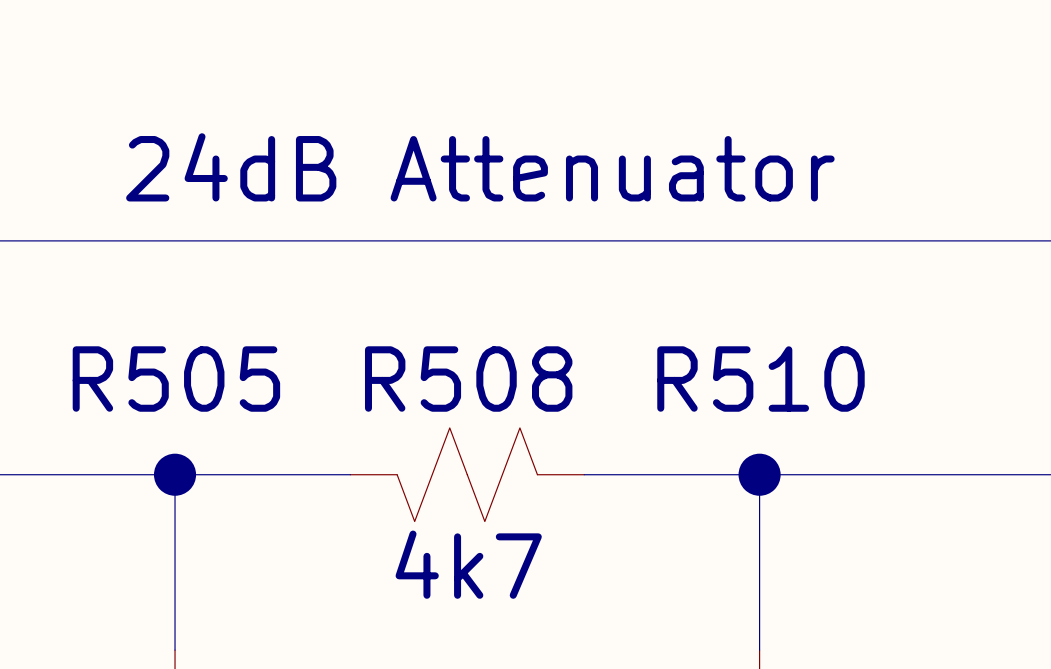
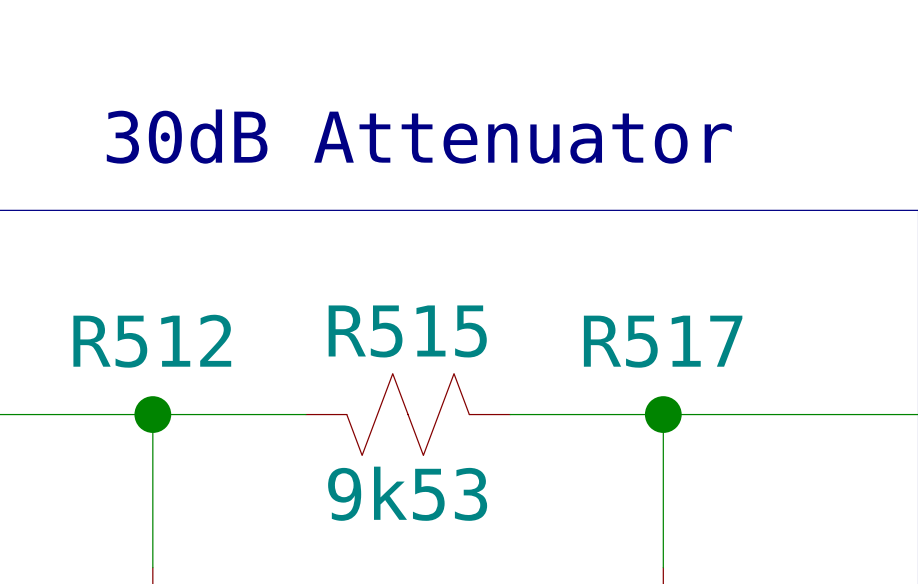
text: 24dB Attenuator (480, 167) -> 30dB Attenuator (419, 136)
R505 name: R505 (176, 379) -> R512 (152, 341)
R508 name: R508 (468, 379) -> R515 (407, 331)
R510 name: R510 (760, 379) -> R517 (663, 341)
R508 value: 4k7 (468, 564) -> 9k53 (407, 493)

